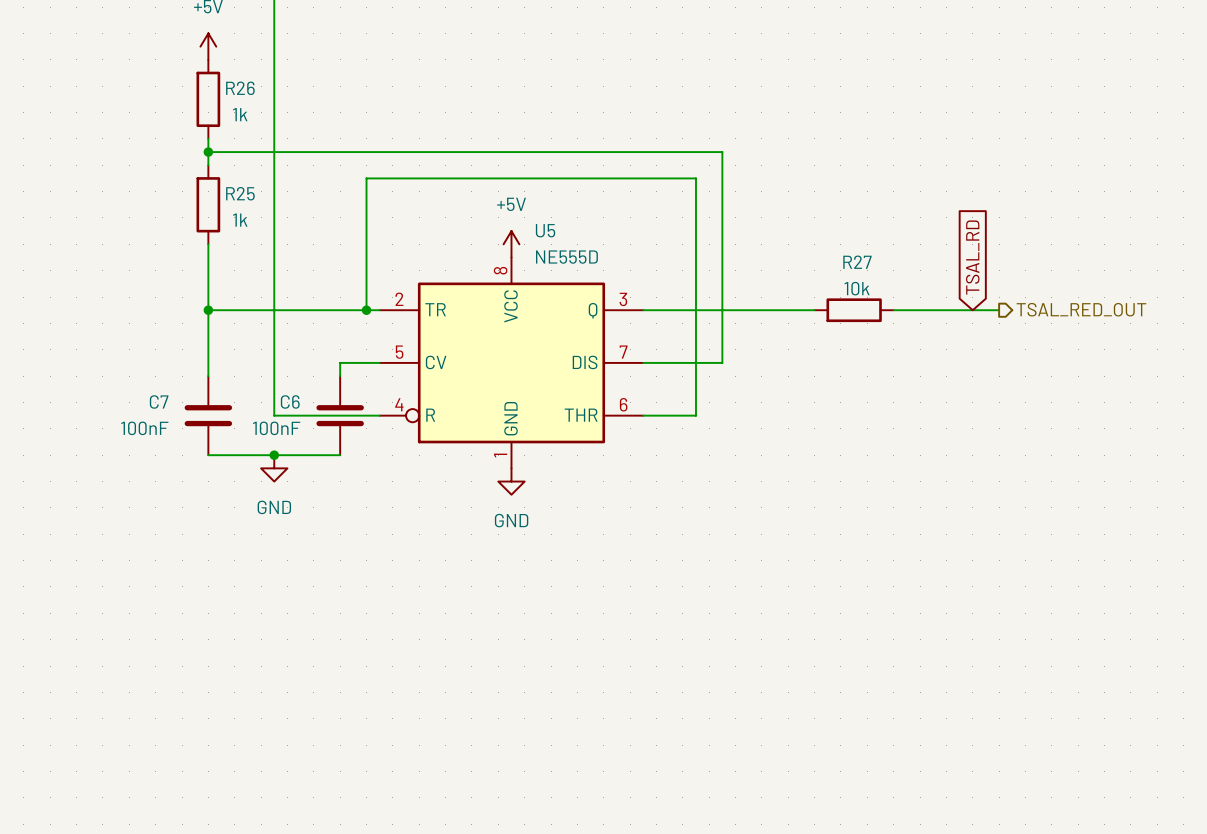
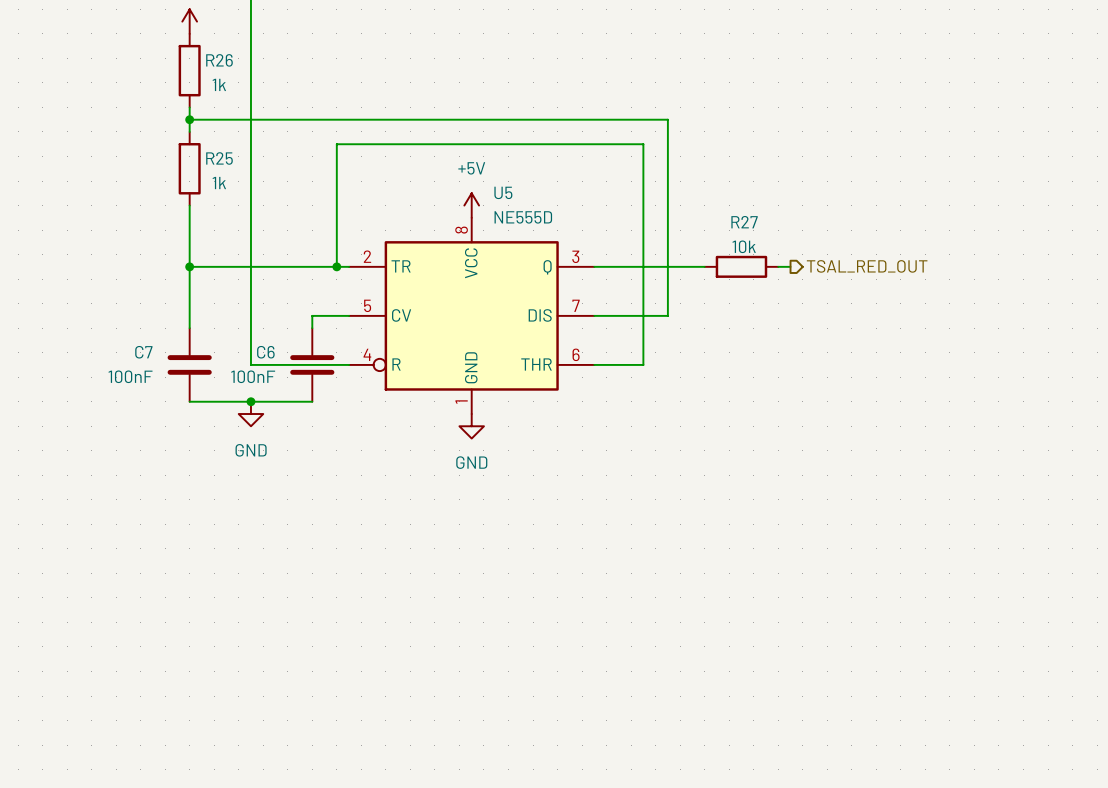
global label: TSAL_RD (972, 257) -> none
hierarchical label position: TSAL_RED_OUT (1081, 309) -> TSAL_RED_OUT (867, 266)
wire: (761, 310) (814, 310) -> none
wire: none -> (778, 266) (790, 266)
R27 position: (854, 310) -> (741, 266)
wire: (893, 310) (999, 310) -> none

